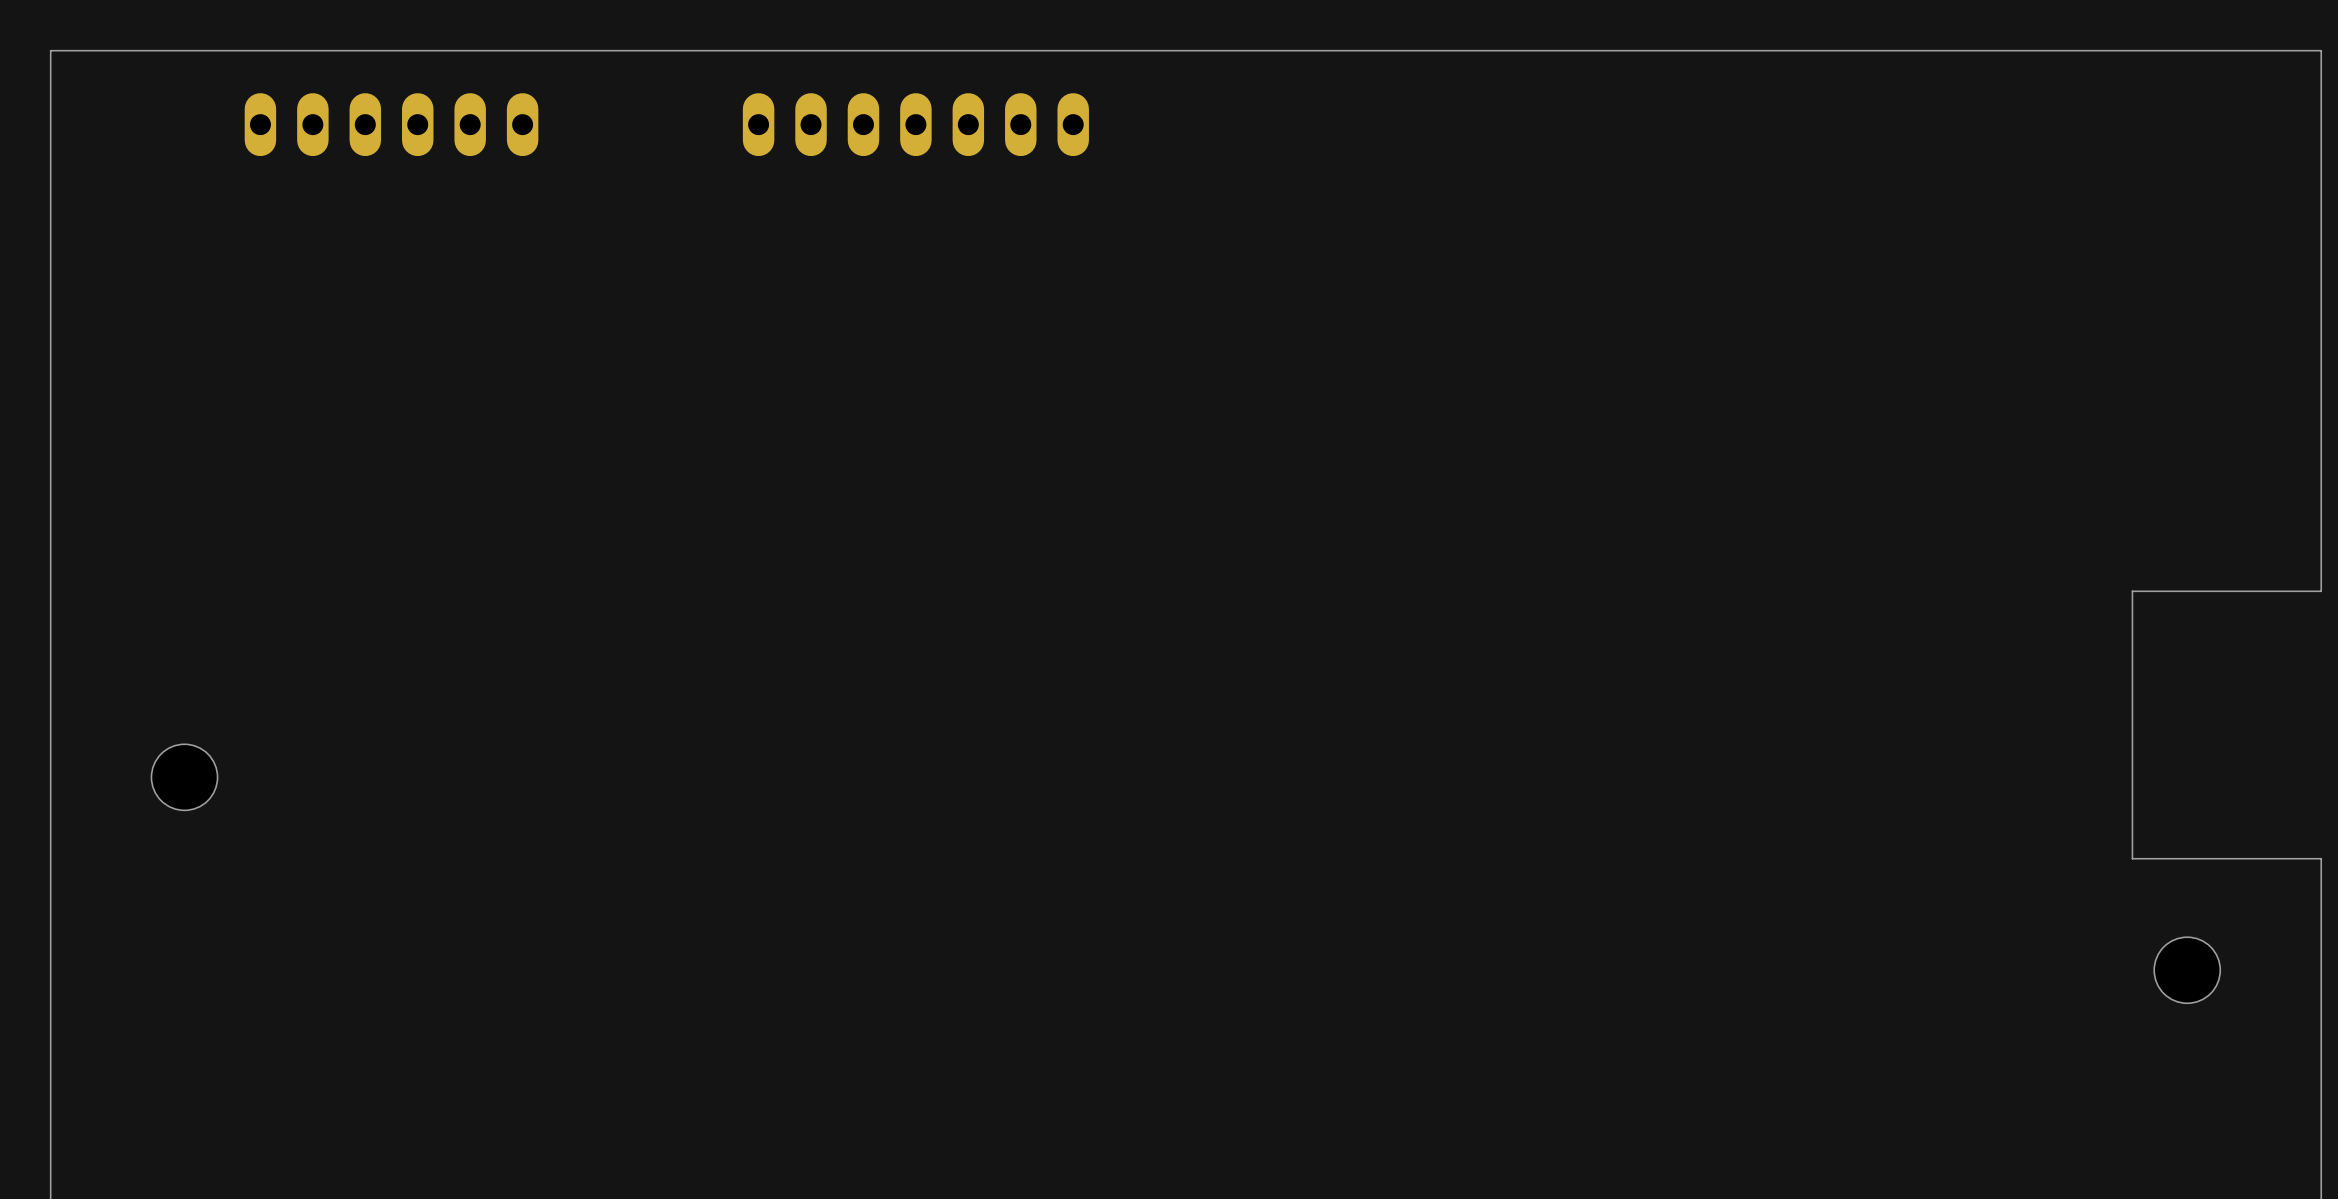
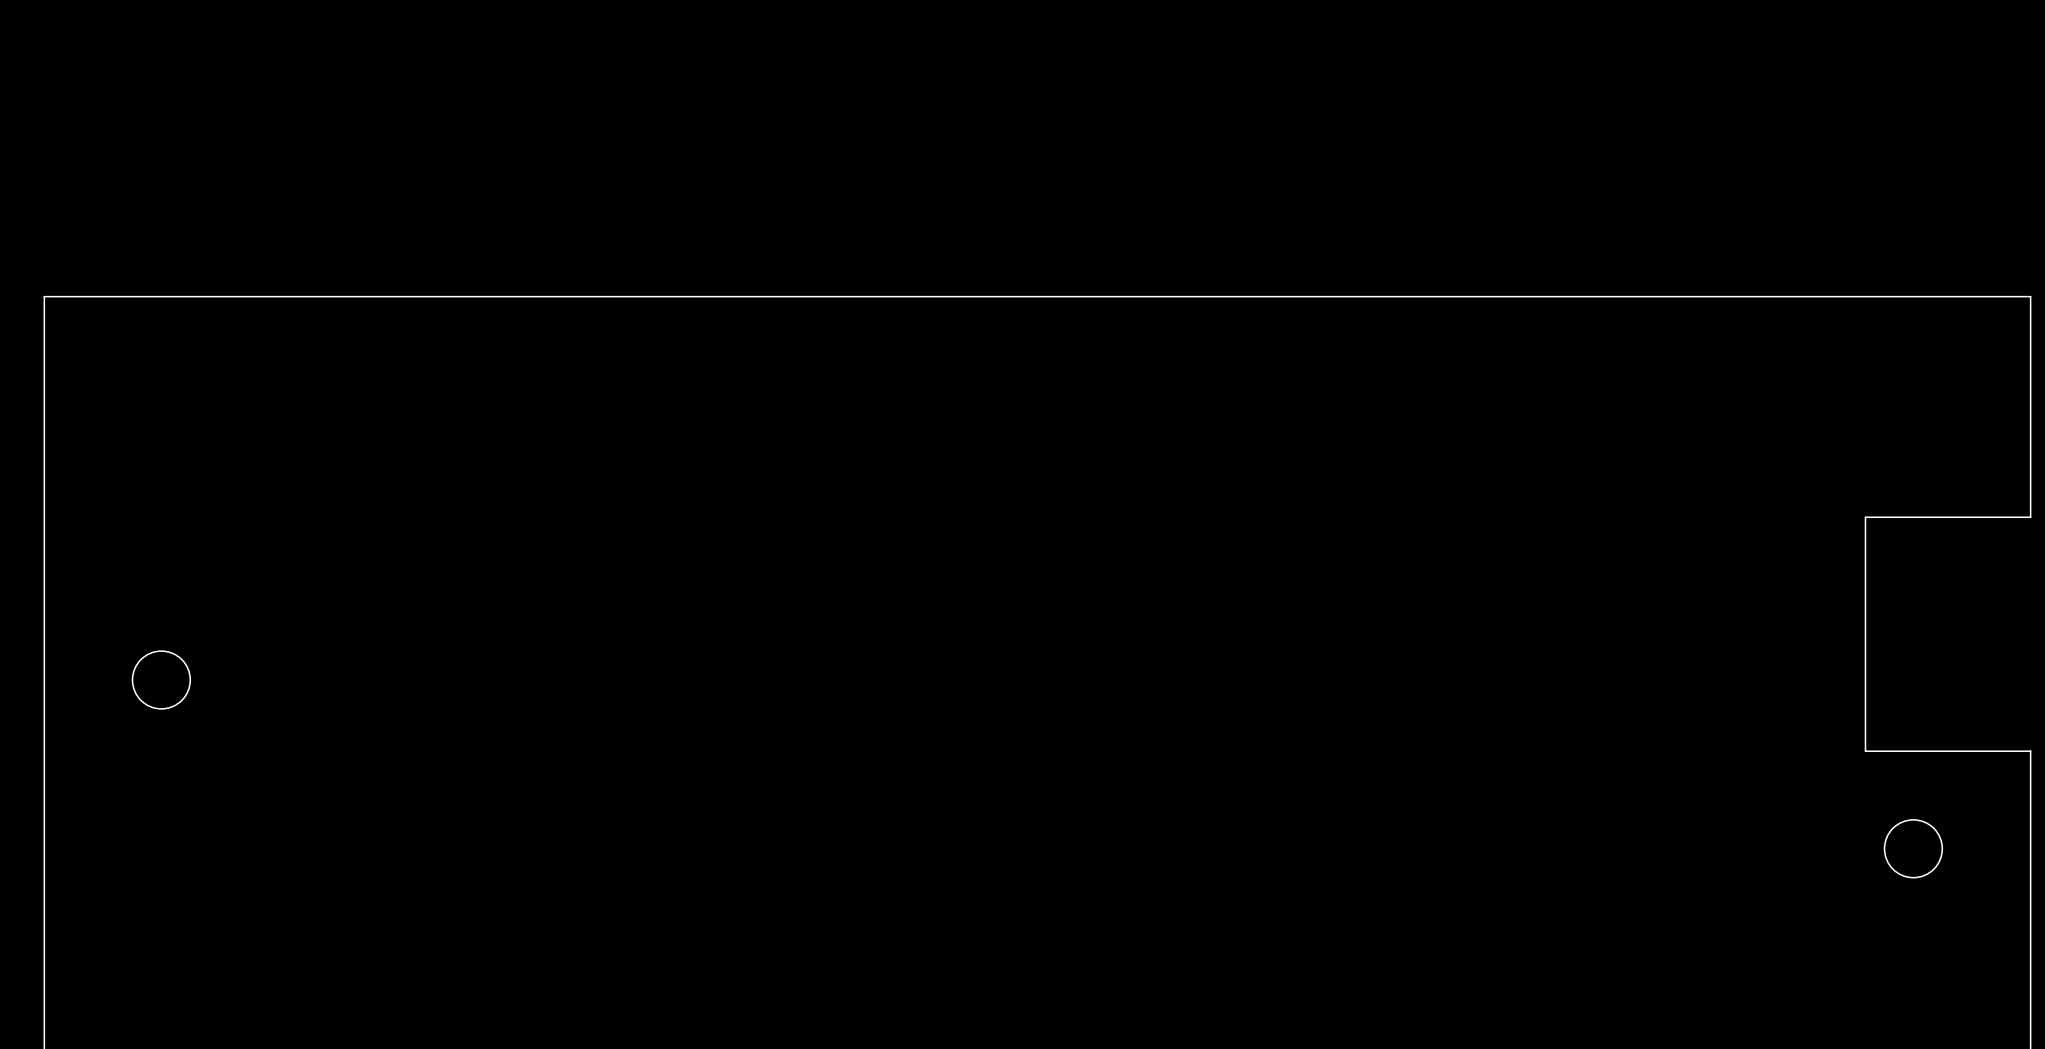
part: (391, 124) -> none
part: (915, 124) -> none
board edge: (2321, 339) (2321, 50) (50, 50) (50, 339) -> (2030, 296) (44, 296)

